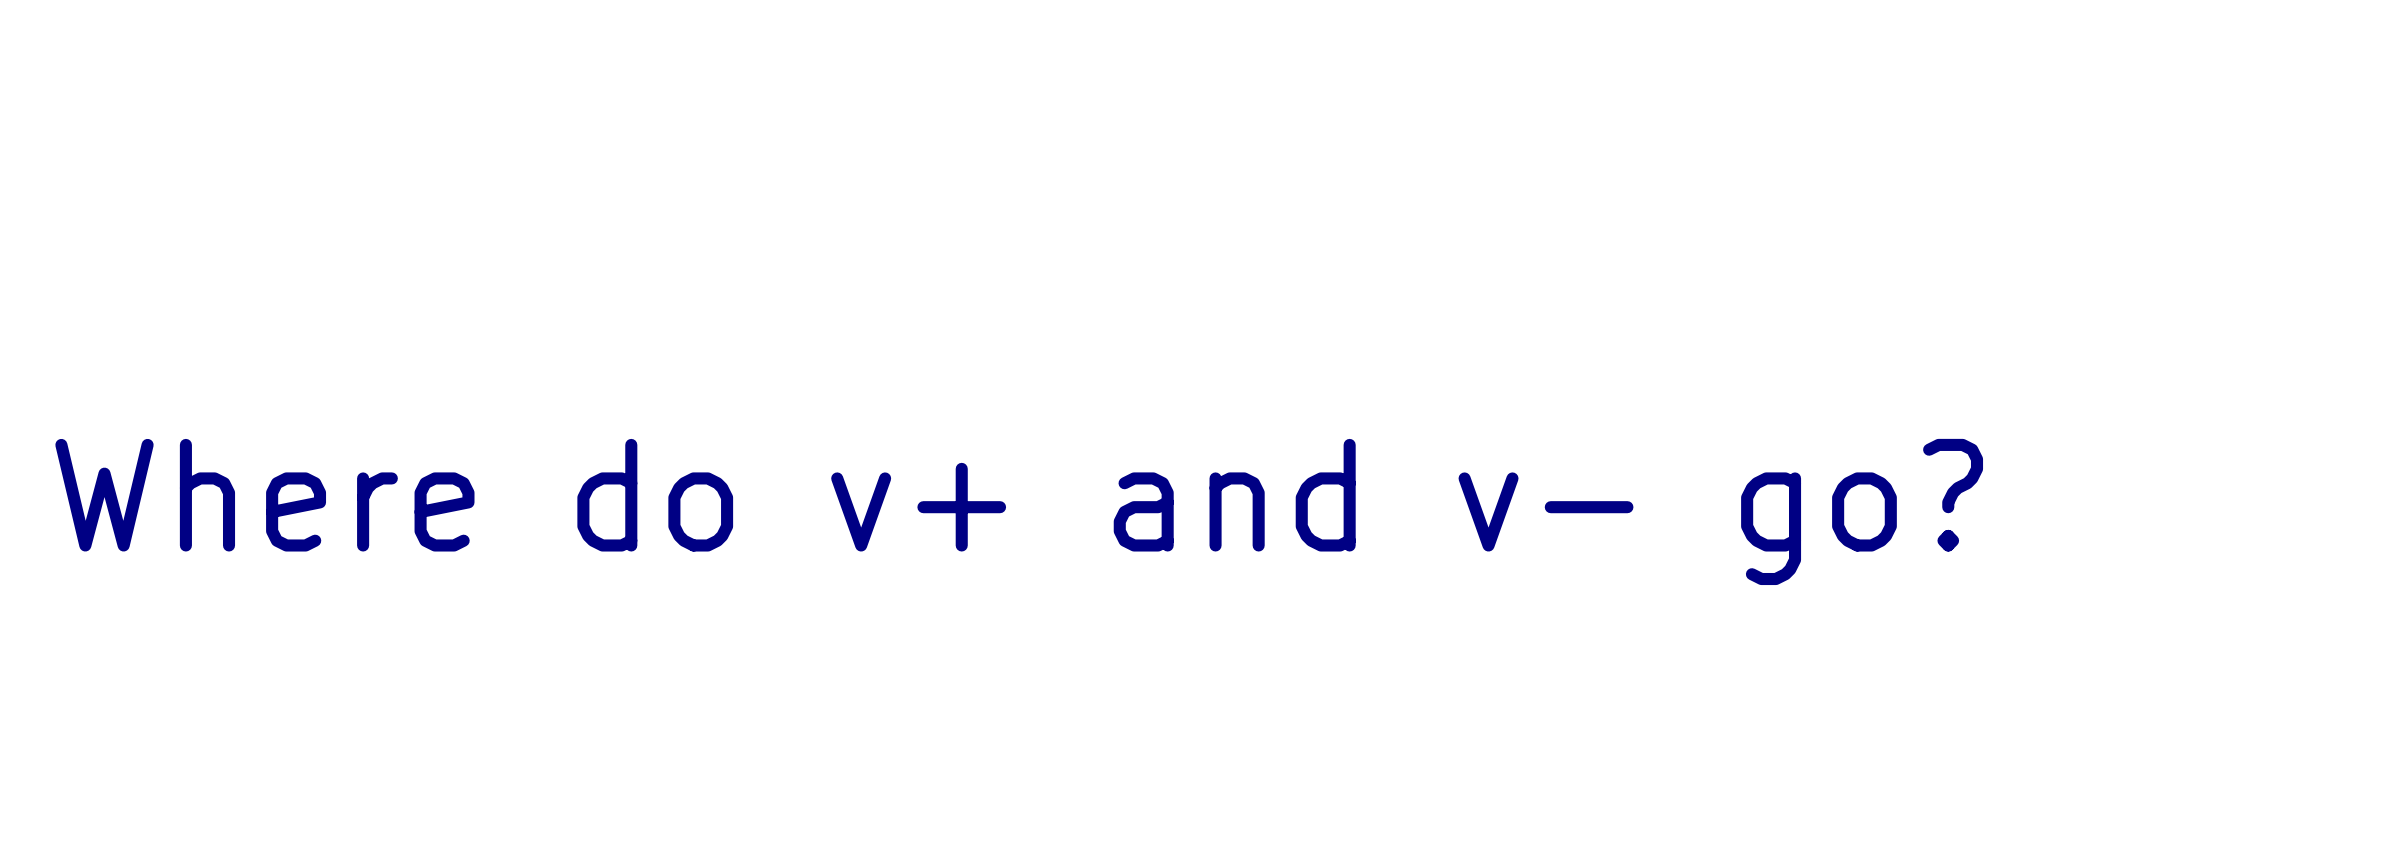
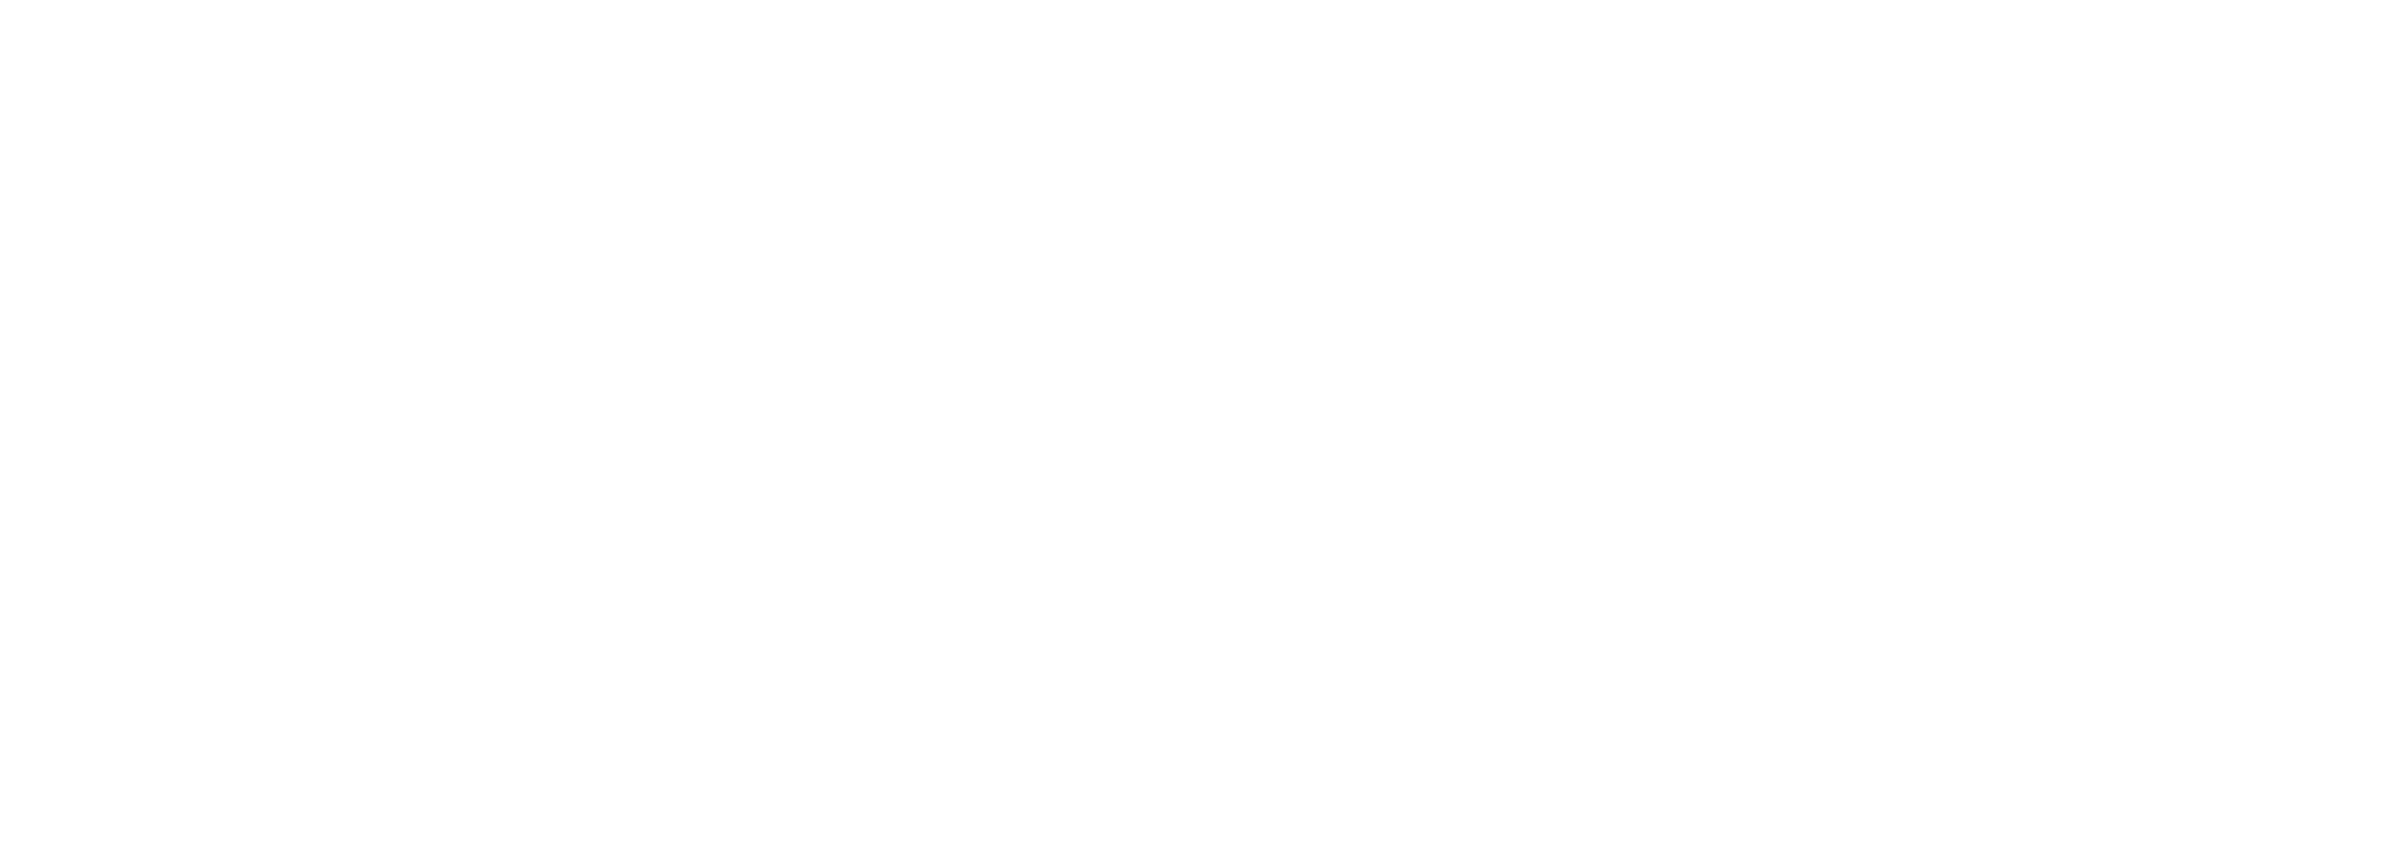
text: Where do v+ and v- go? (1019, 511) -> none

